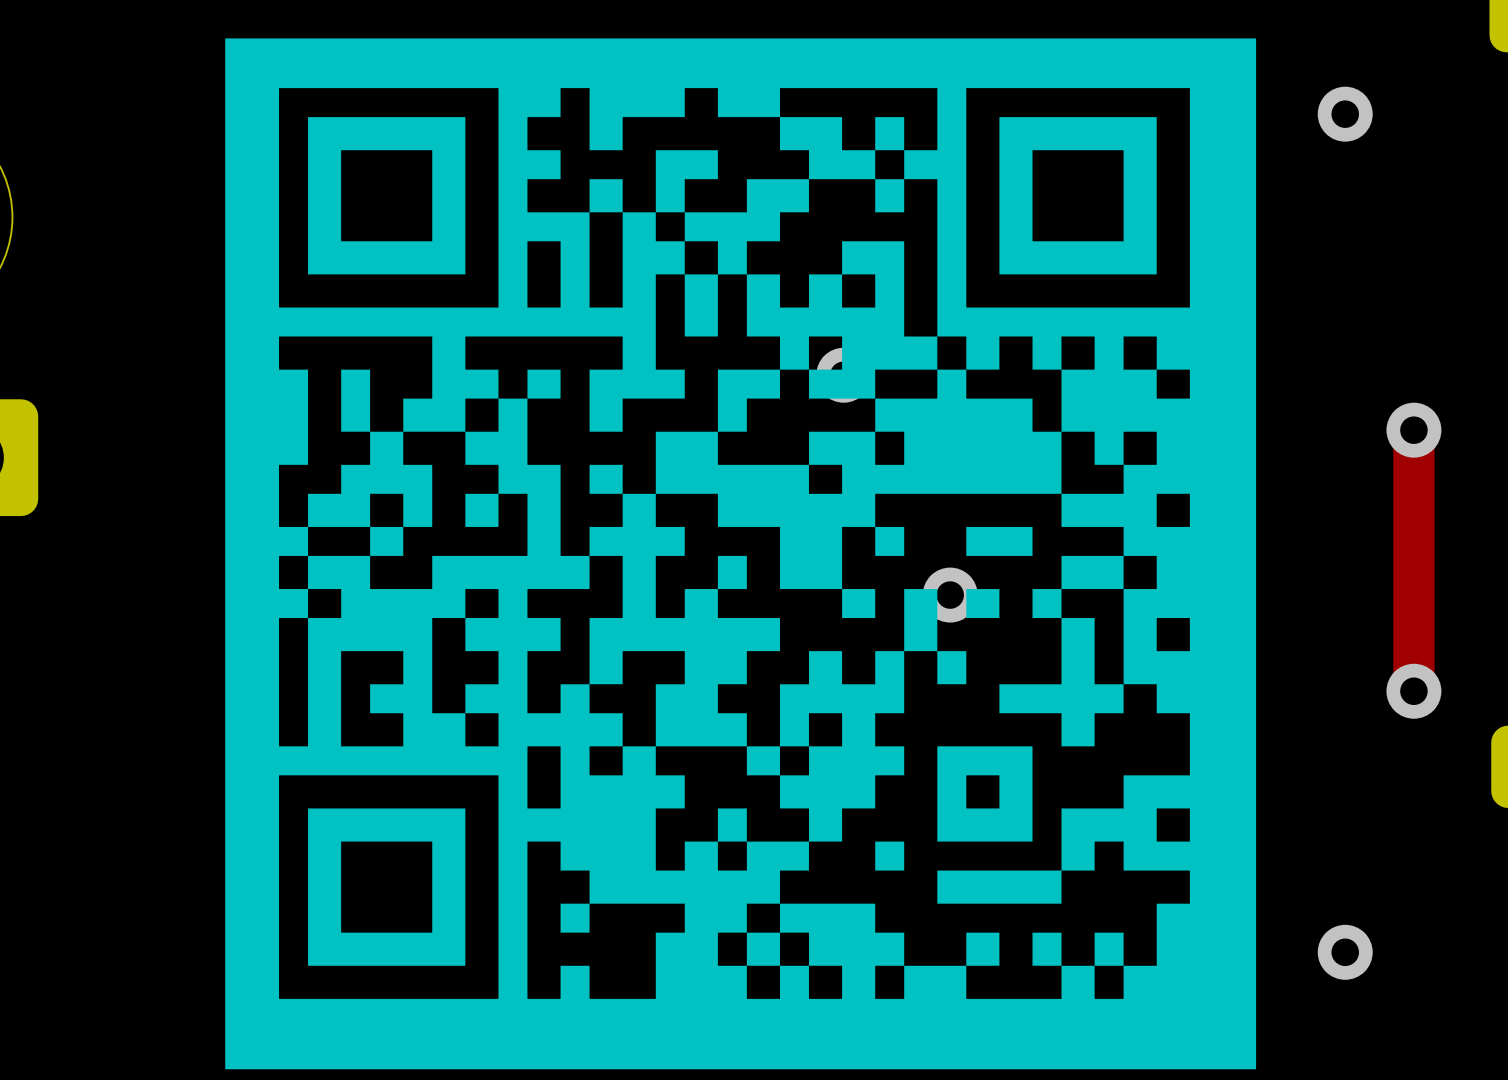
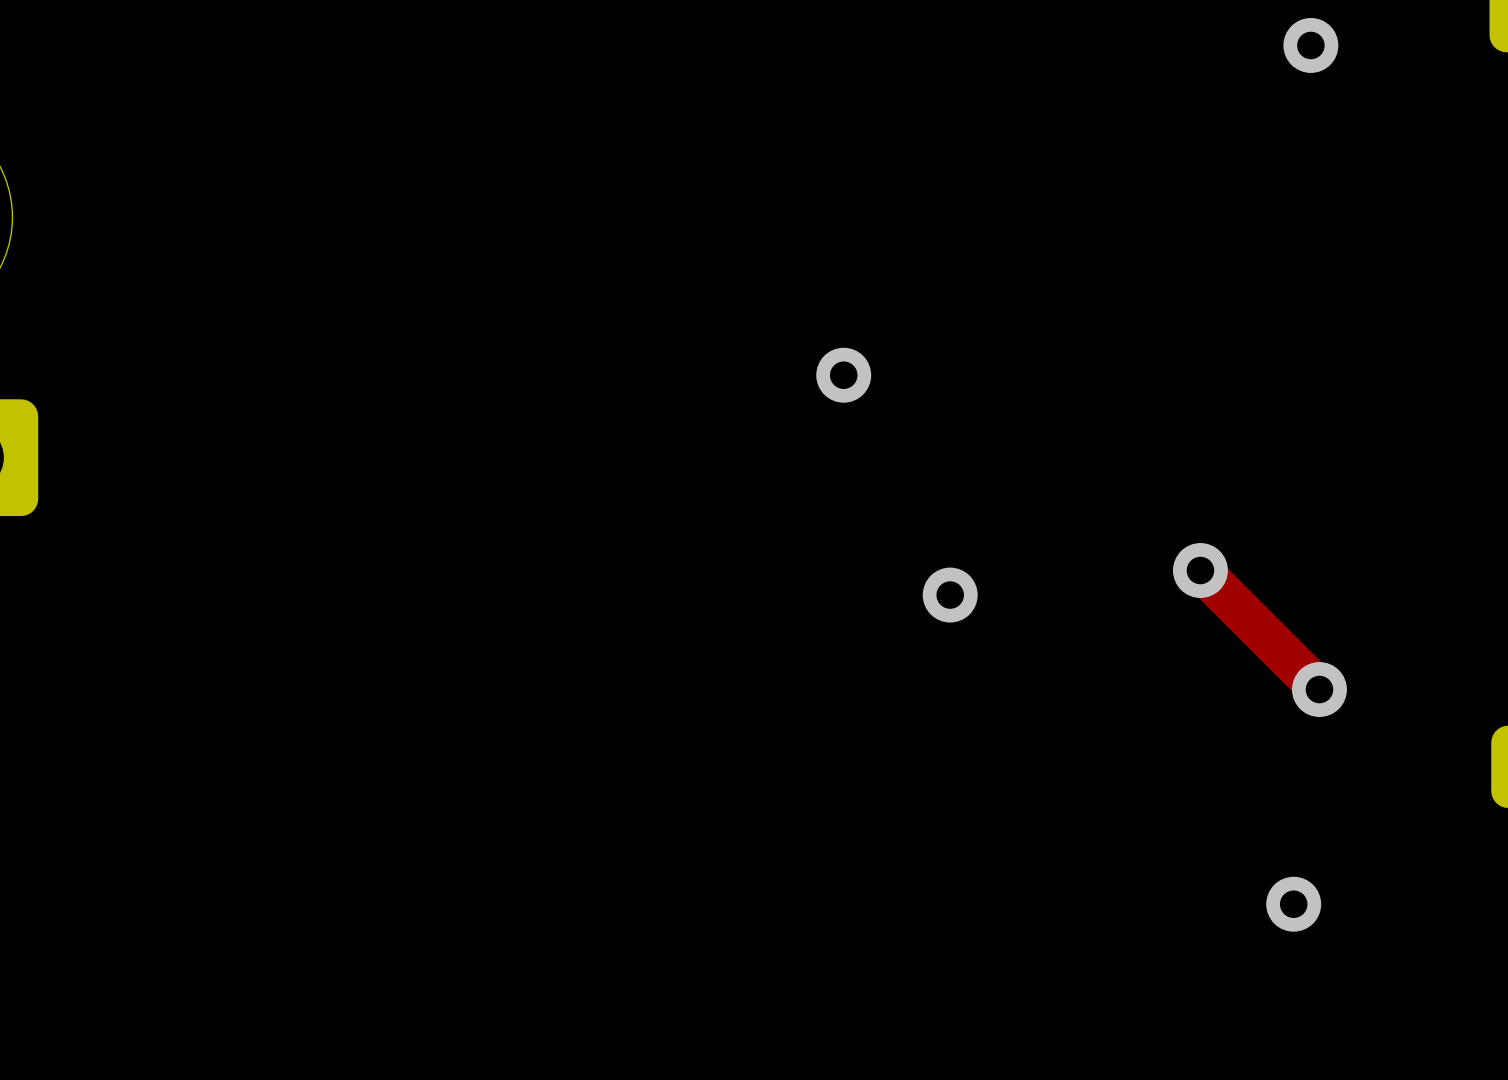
drawing: [225, 38, 1257, 1070] -> none
via position: (1345, 114) -> (1310, 45)
track: (1413, 430) (1413, 691) -> none
via: (1413, 430) -> none
track: none -> (1200, 570) (1319, 689)
via: none -> (1200, 570)
via position: (1413, 691) -> (1319, 689)
via position: (1345, 952) -> (1293, 904)

